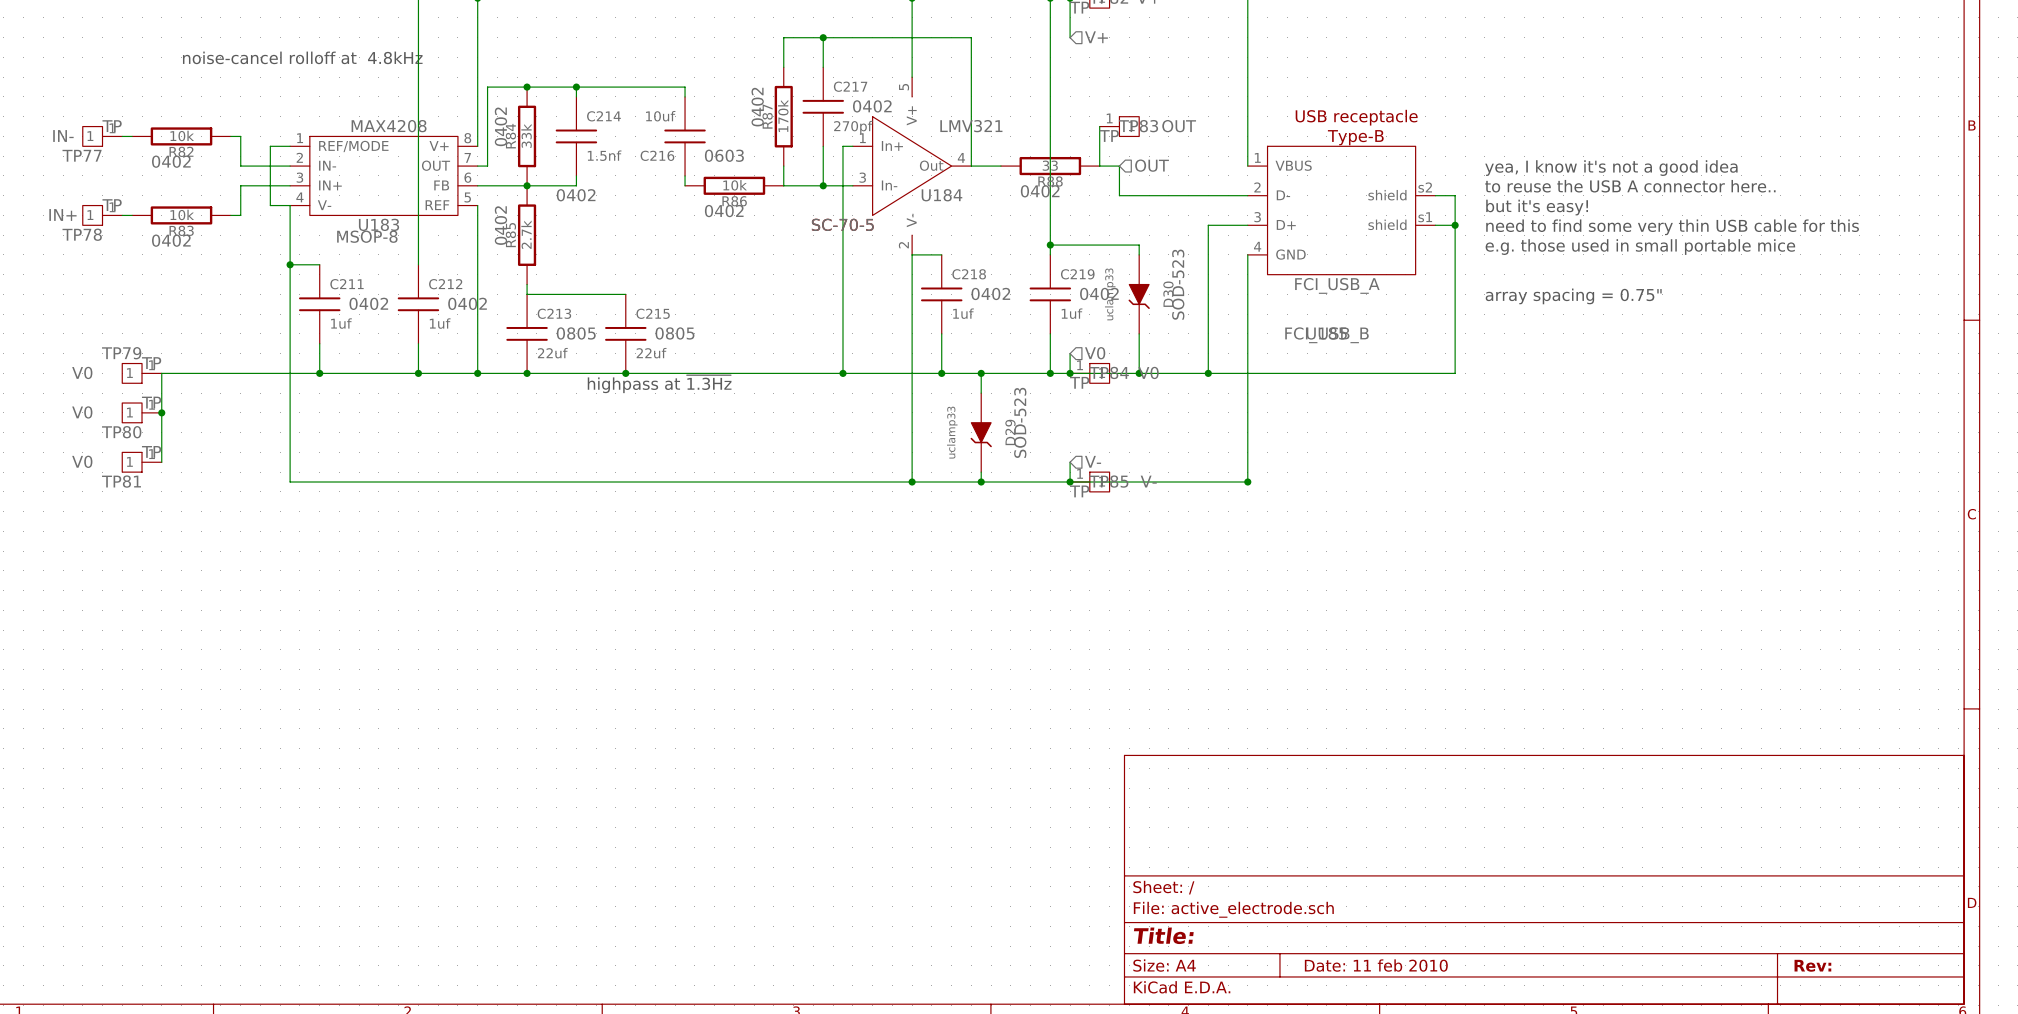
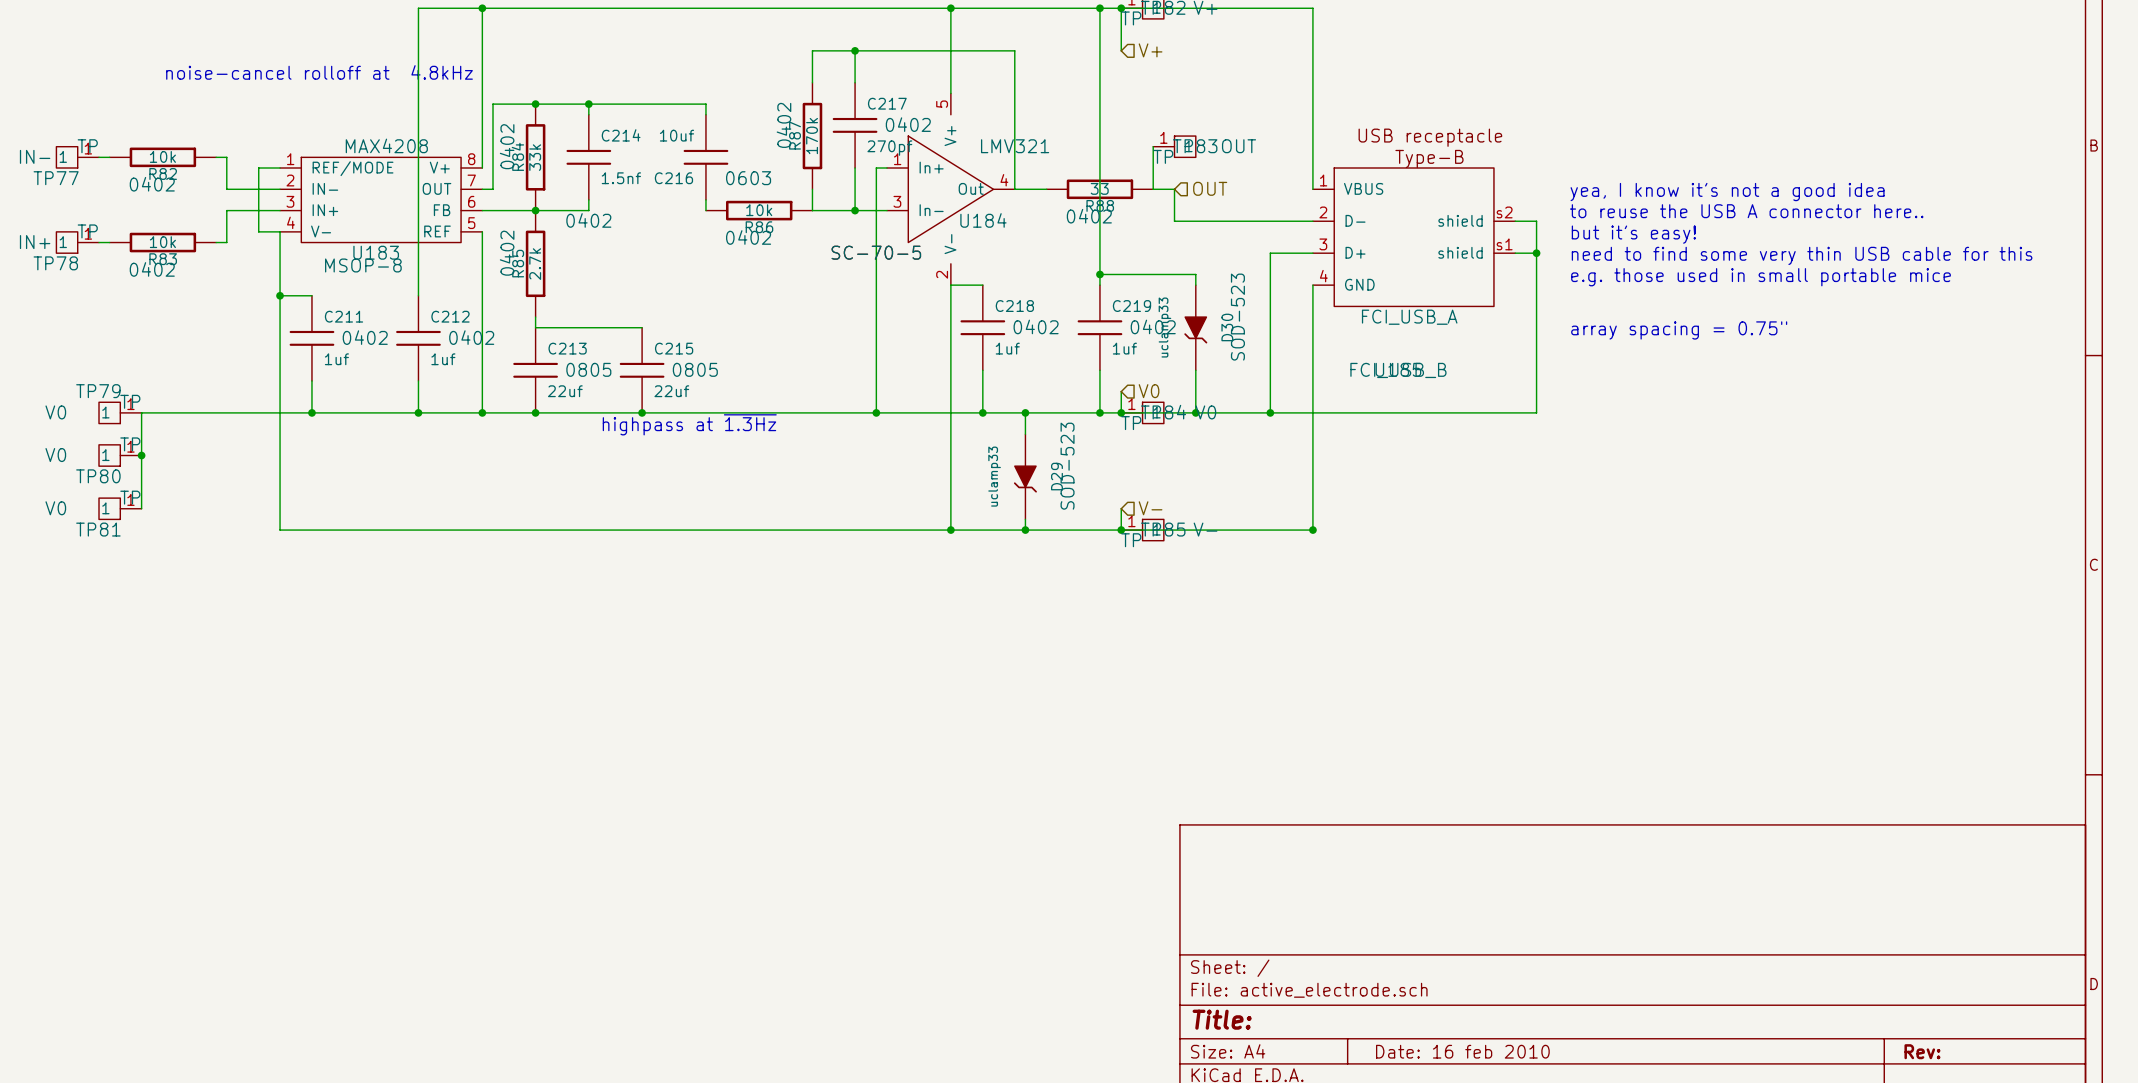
title block: Date: 11 feb 2010 (1376, 965) -> Date: 16 feb 2010 (1462, 1051)

